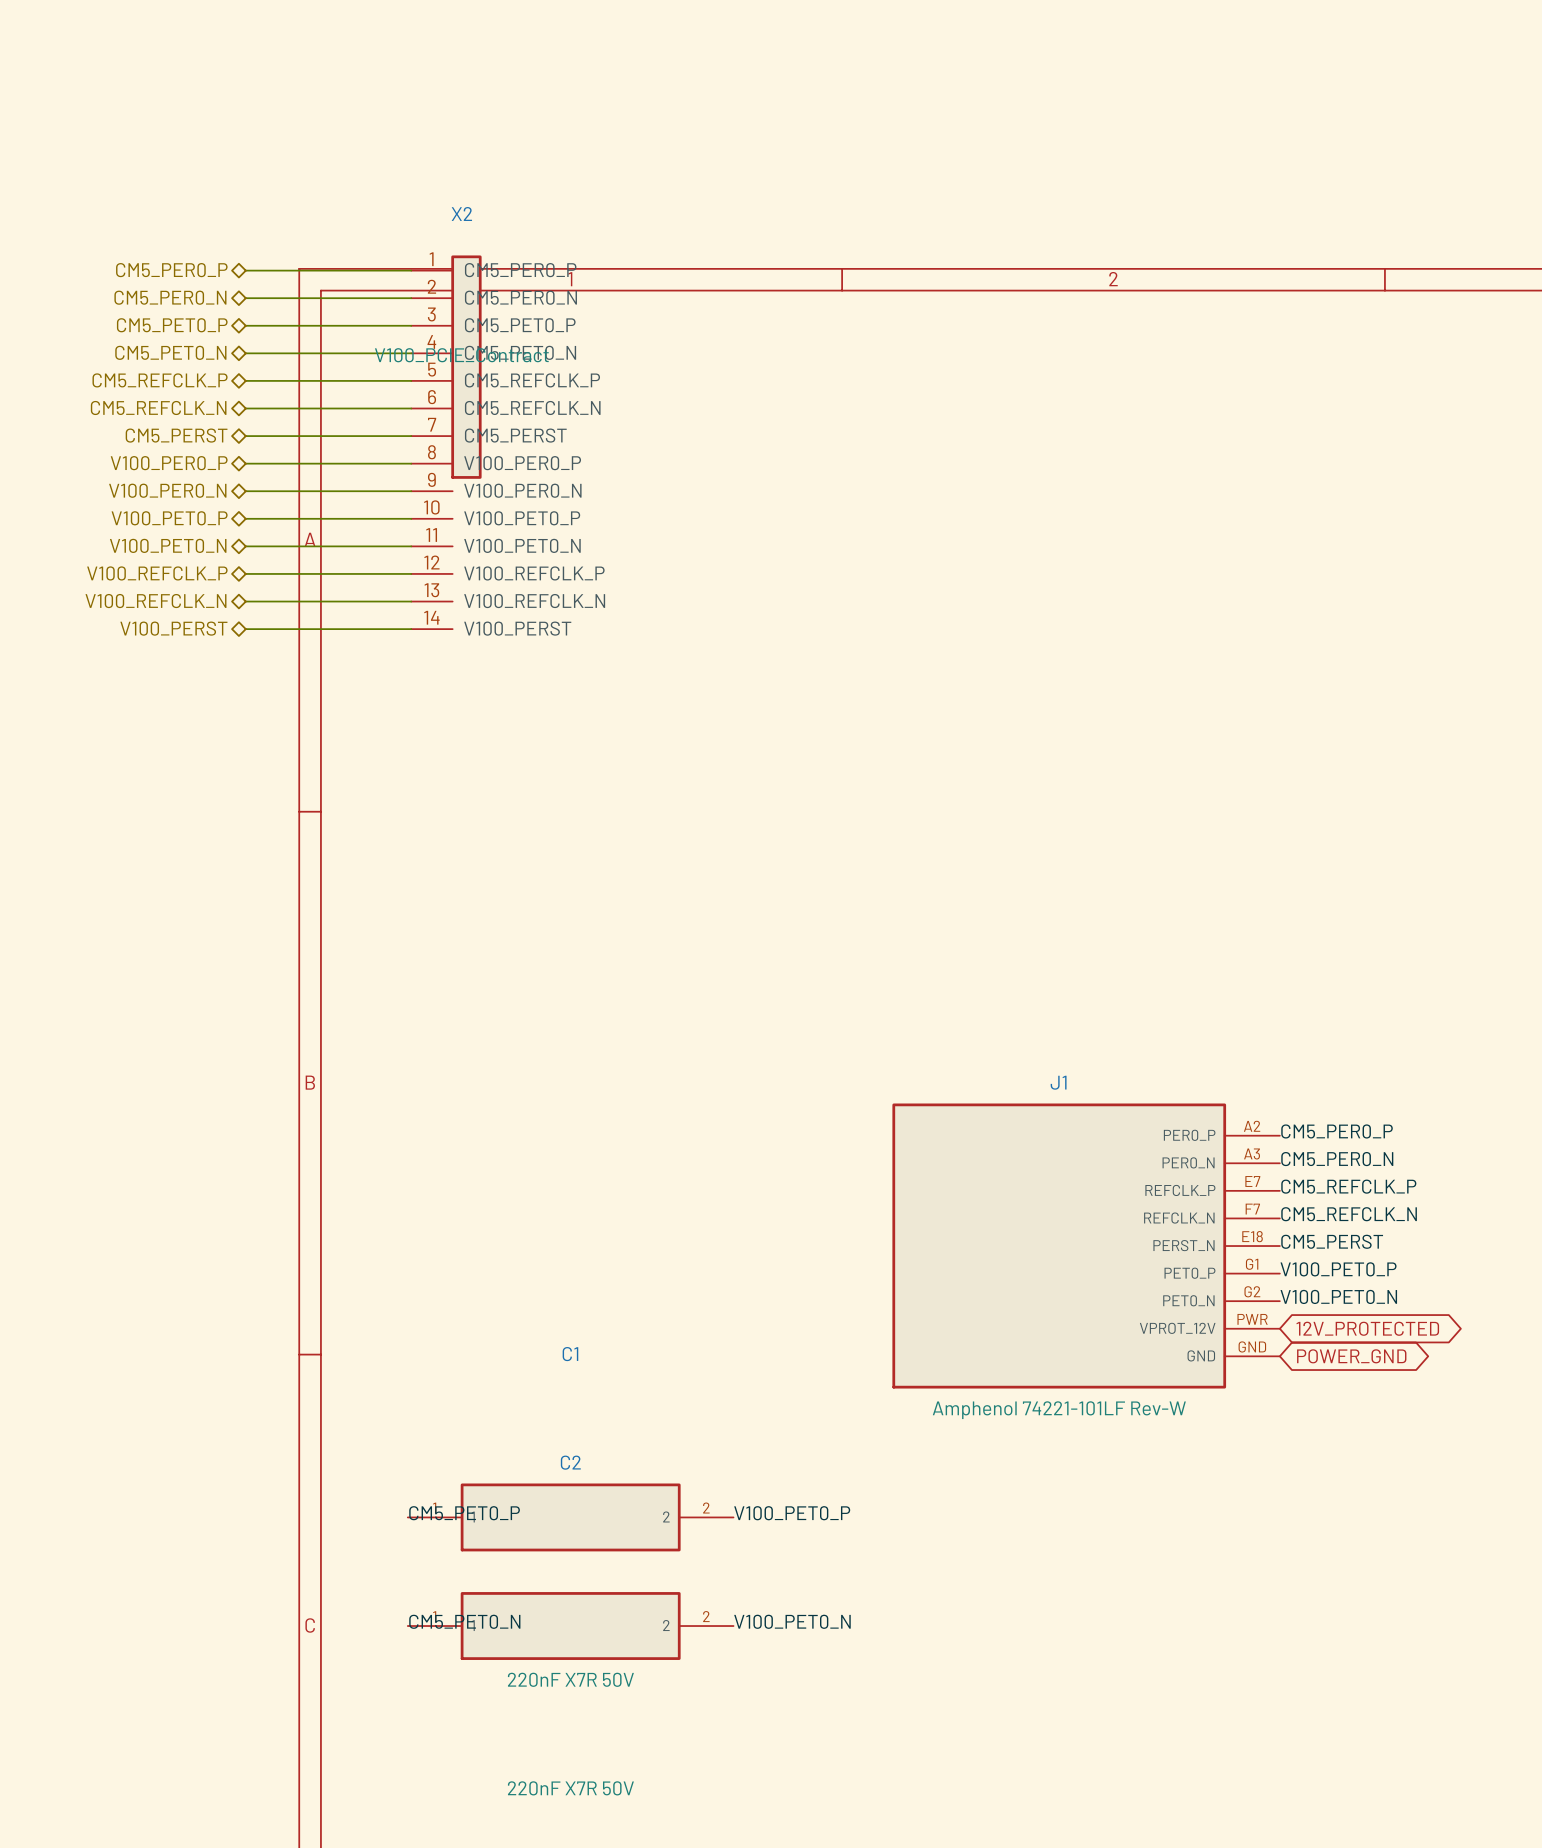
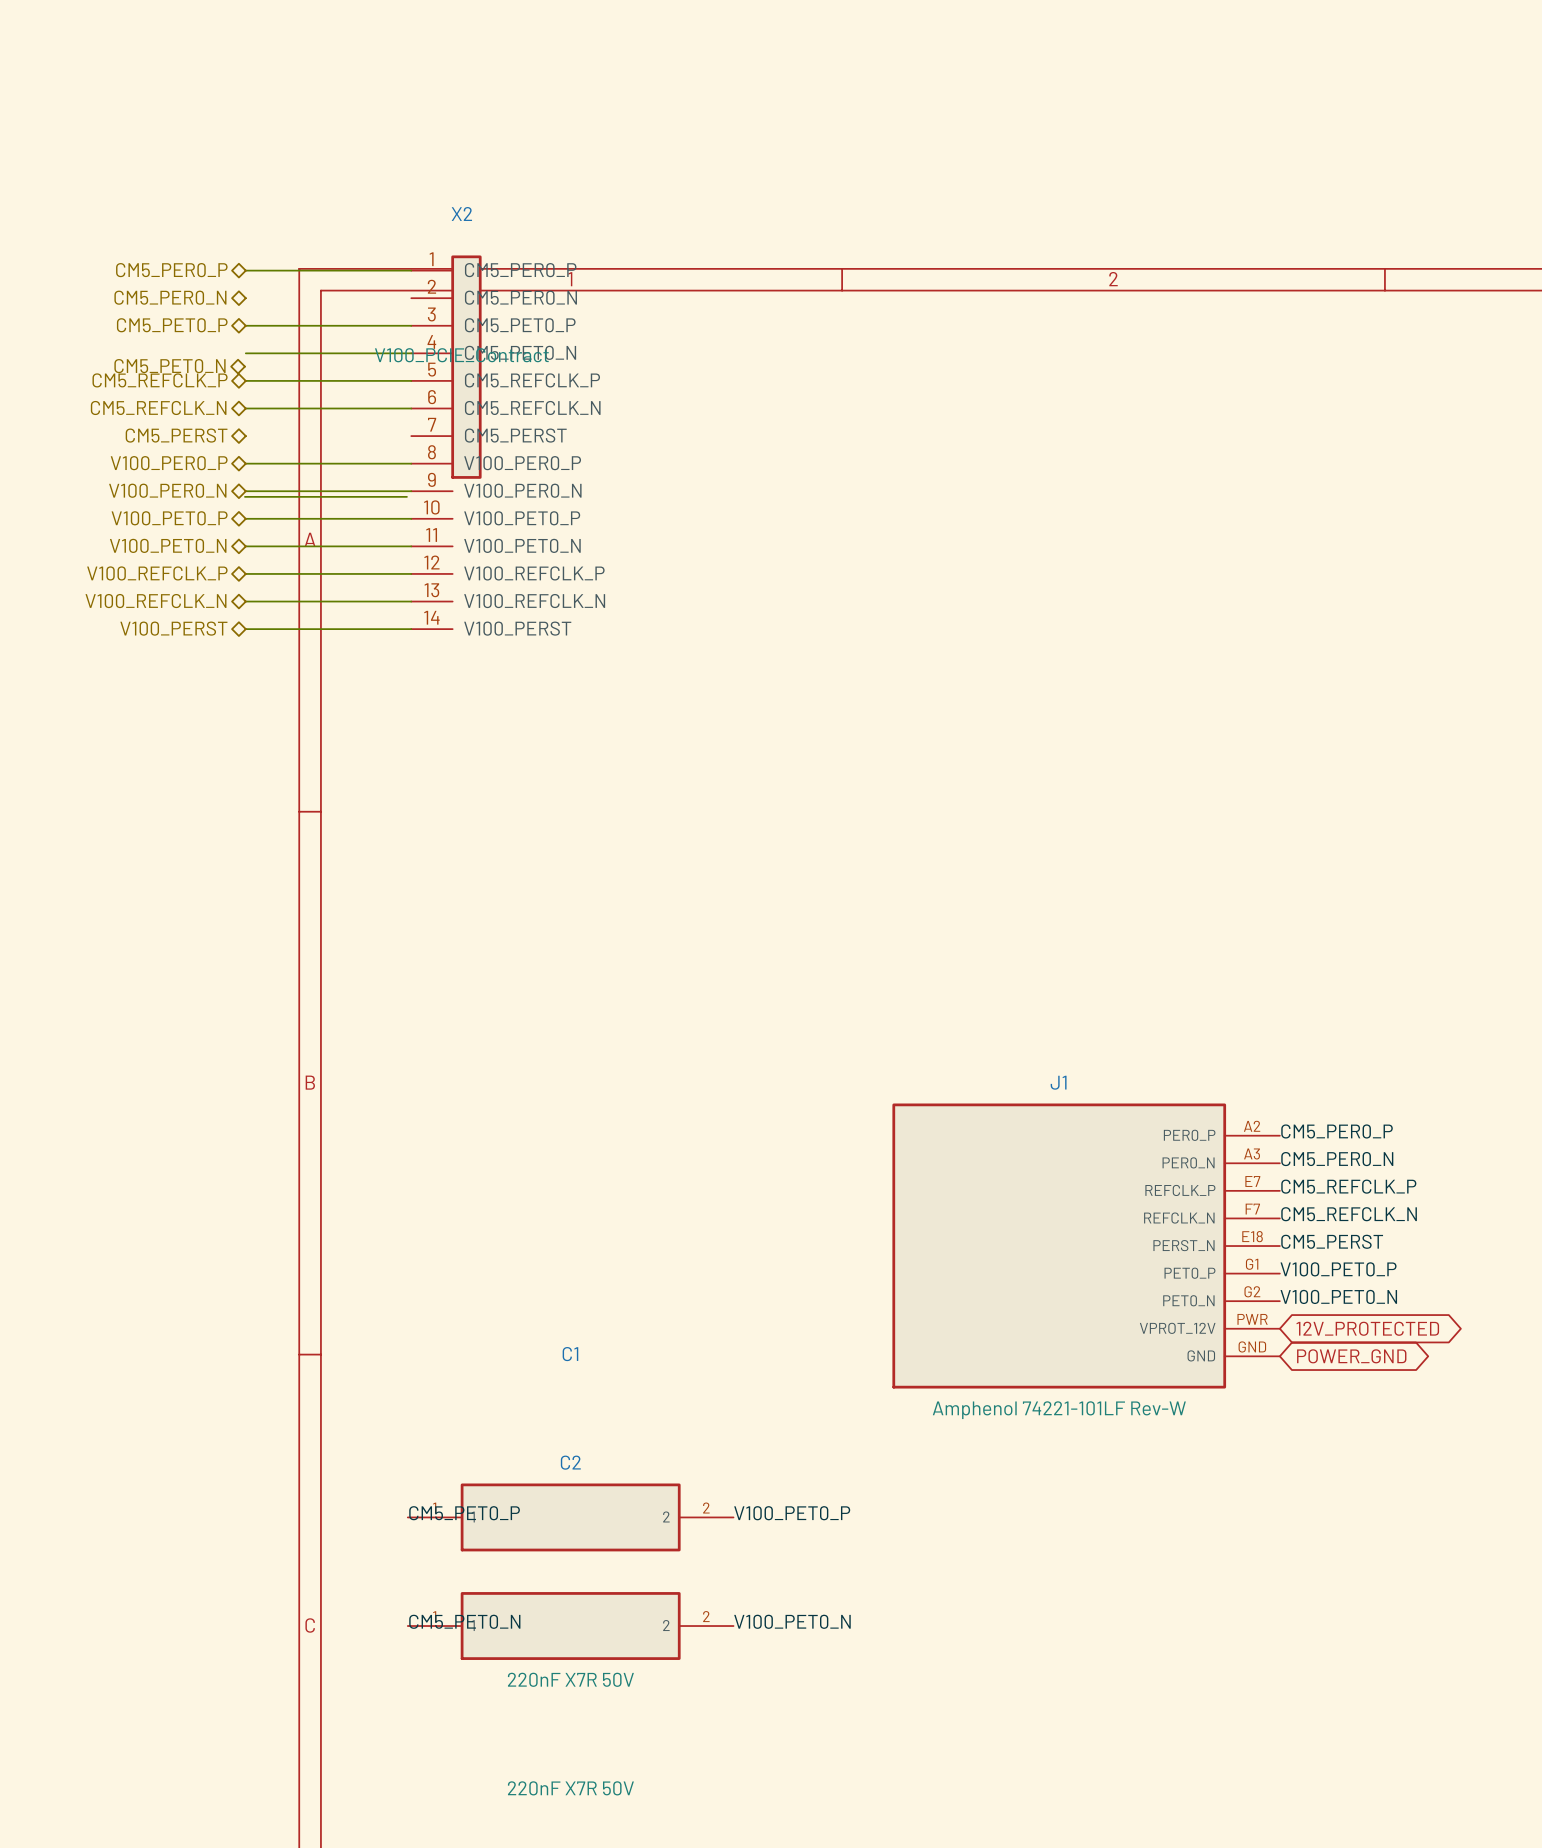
wire: (245, 298) (411, 298) -> none
hierarchical label position: CM5_PET0_N (170, 352) -> CM5_PET0_N (169, 366)
wire: (245, 436) (411, 436) -> none
wire: none -> (244, 496) (406, 496)

